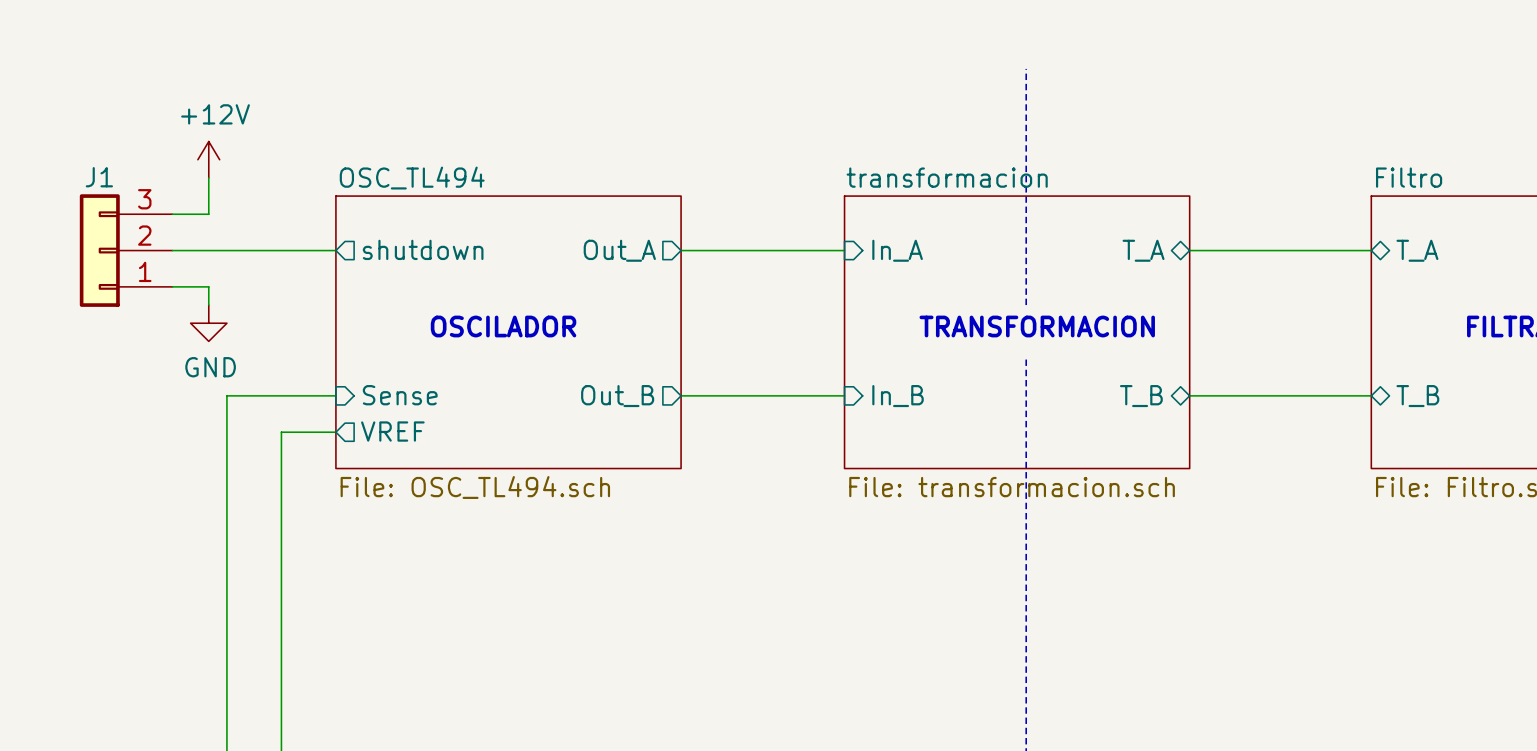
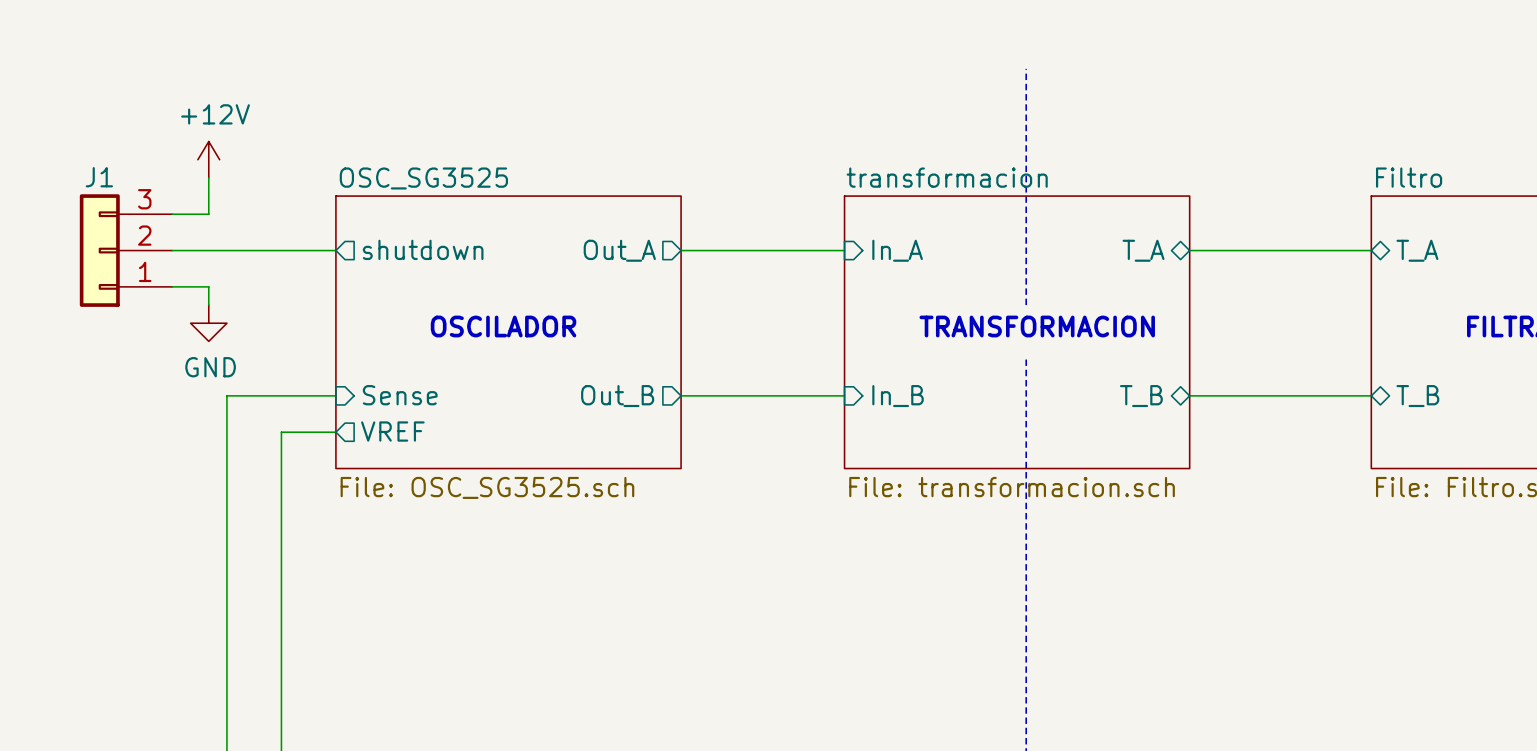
sheet OSC_TL494 name: OSC_TL494 (412, 178) -> OSC_SG3525 (423, 178)
sheet OSC_TL494 value: File: OSC_TL494.sch (475, 487) -> File: OSC_SG3525.sch (487, 487)

